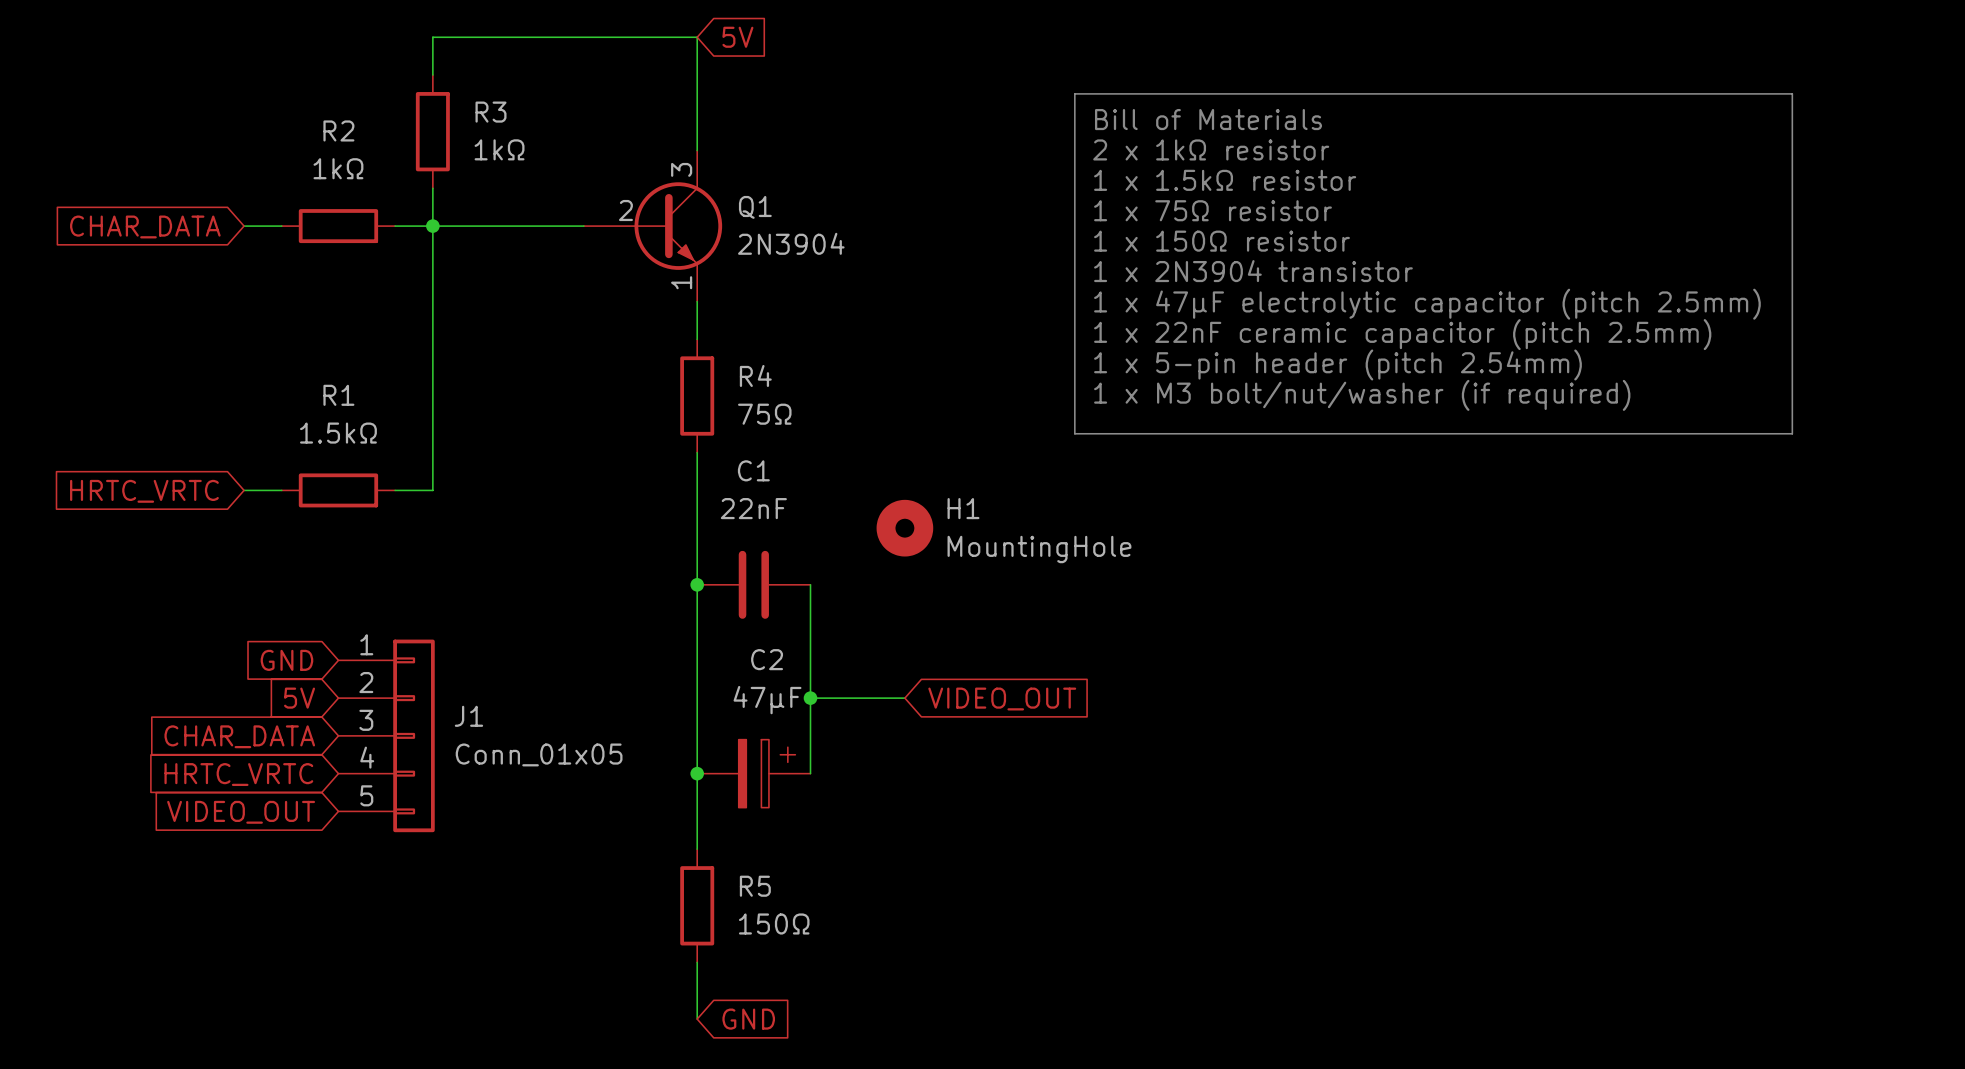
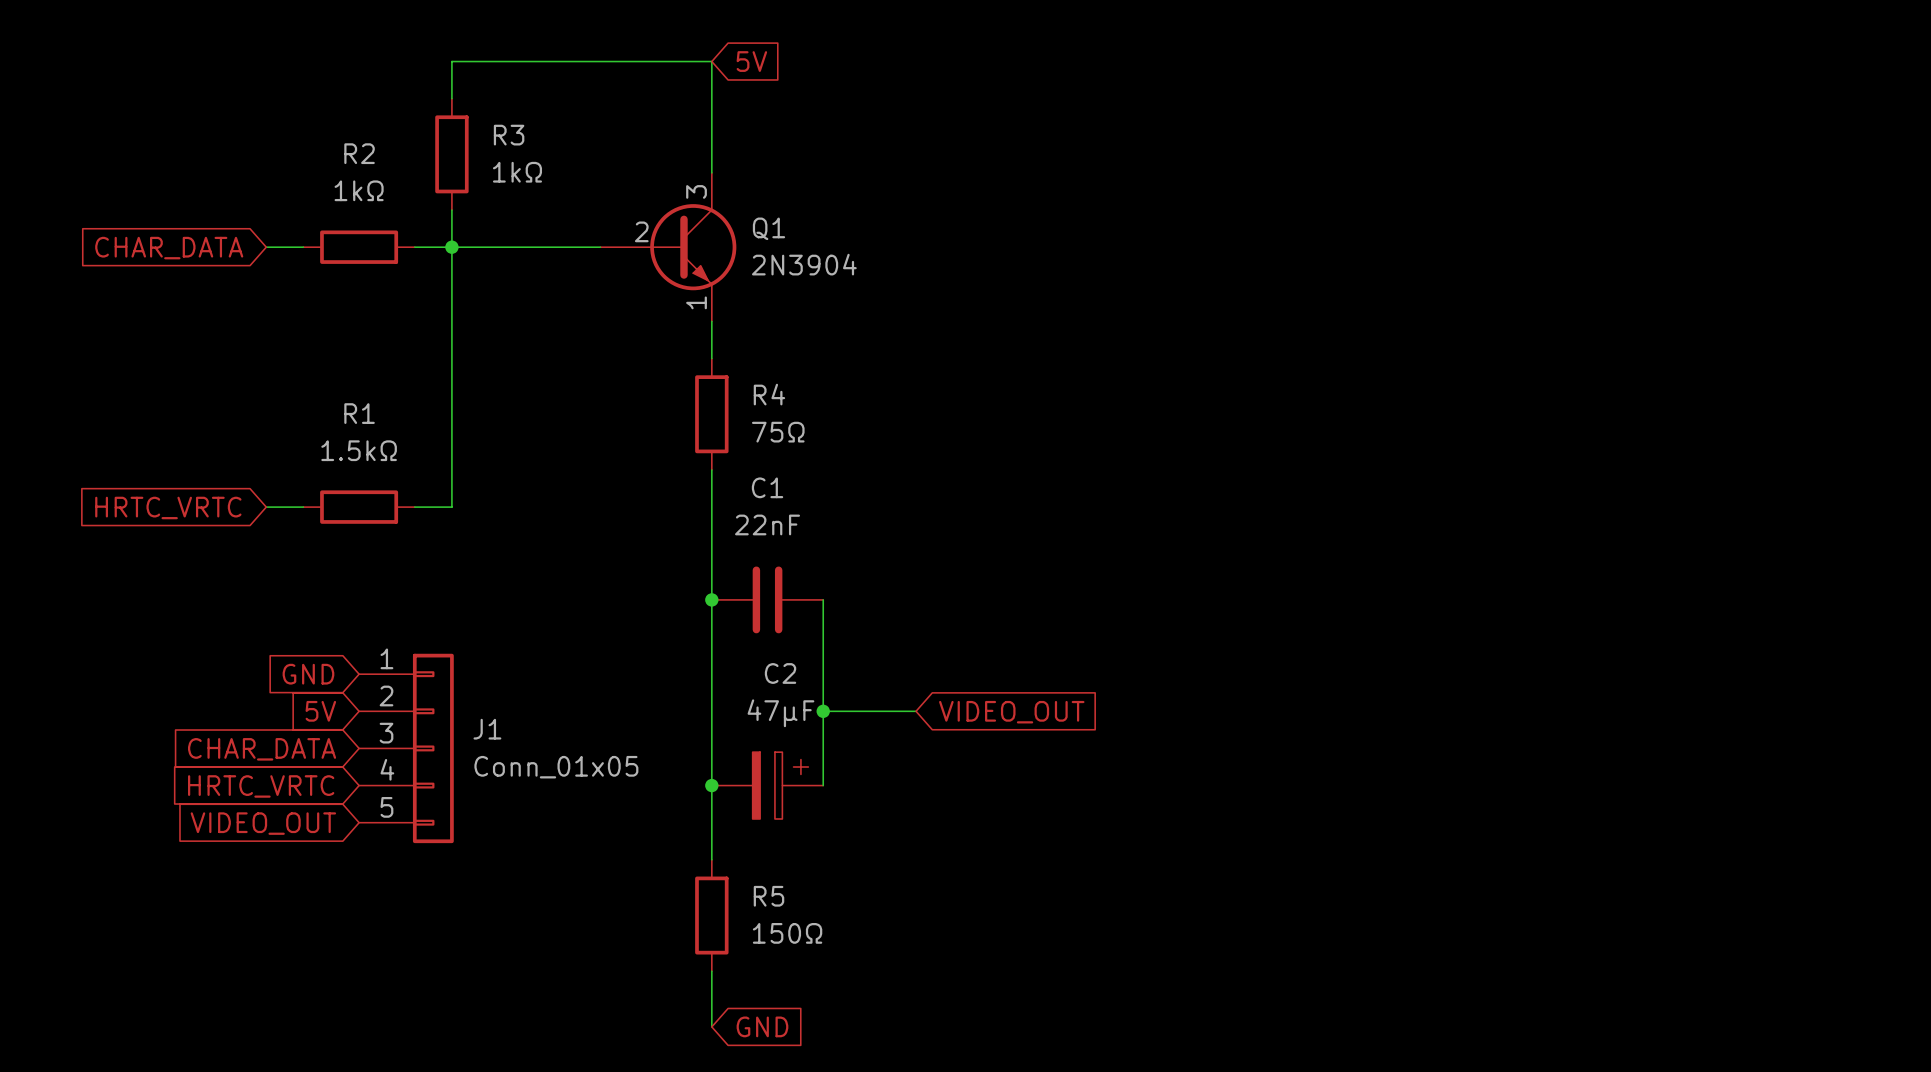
line: (1074, 93) (1792, 93) (1792, 433) (1074, 433) (1074, 93) -> none
text: Bill of Materials (1208, 119) -> none
text: 2 x 1kΩ resistor (1211, 149) -> none
text: 1 x 1.5kΩ resistor (1225, 180) -> none
text: 1 x 75Ω resistor (1213, 210) -> none
text: 1 x 150Ω resistor (1221, 241) -> none
text: 1 x 2N3904 transistor (1253, 271) -> none
text: 1 x 47µF electrolytic capacitor (pitch 2.5mm) (1427, 304) -> none
text: 1 x 22nF ceramic capacitor (pitch 2.5mm) (1402, 334) -> none
text: 1 x 5-pin header (pitch 2.54mm) (1337, 364) -> none
text: 1 x M3 bolt/nut/washer (if required) (1362, 395) -> none
H1: MountingHole (904, 528) -> none

